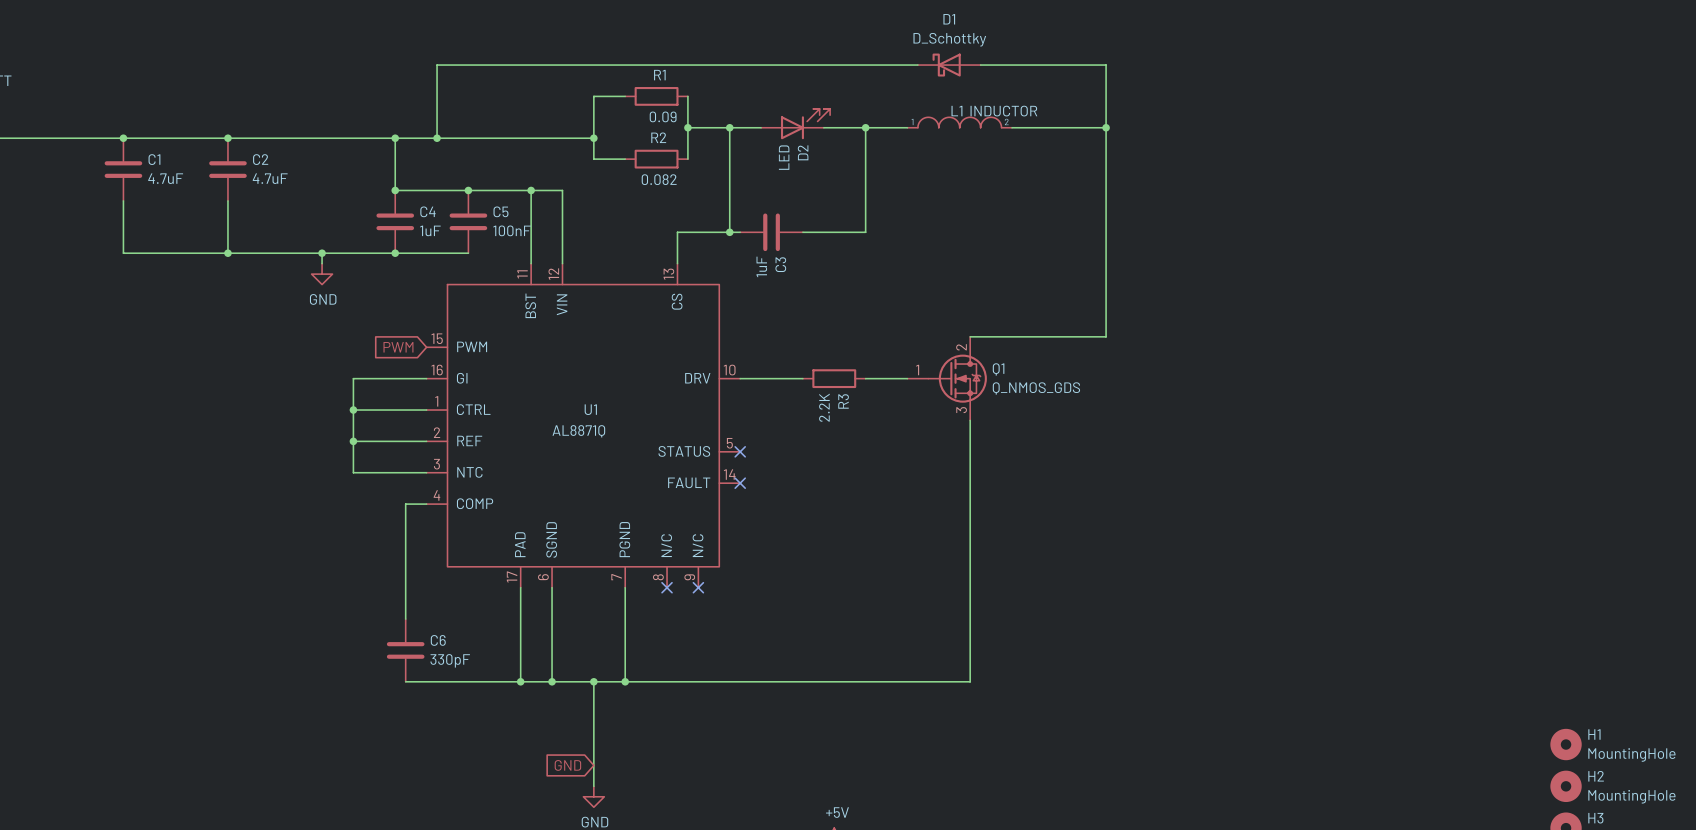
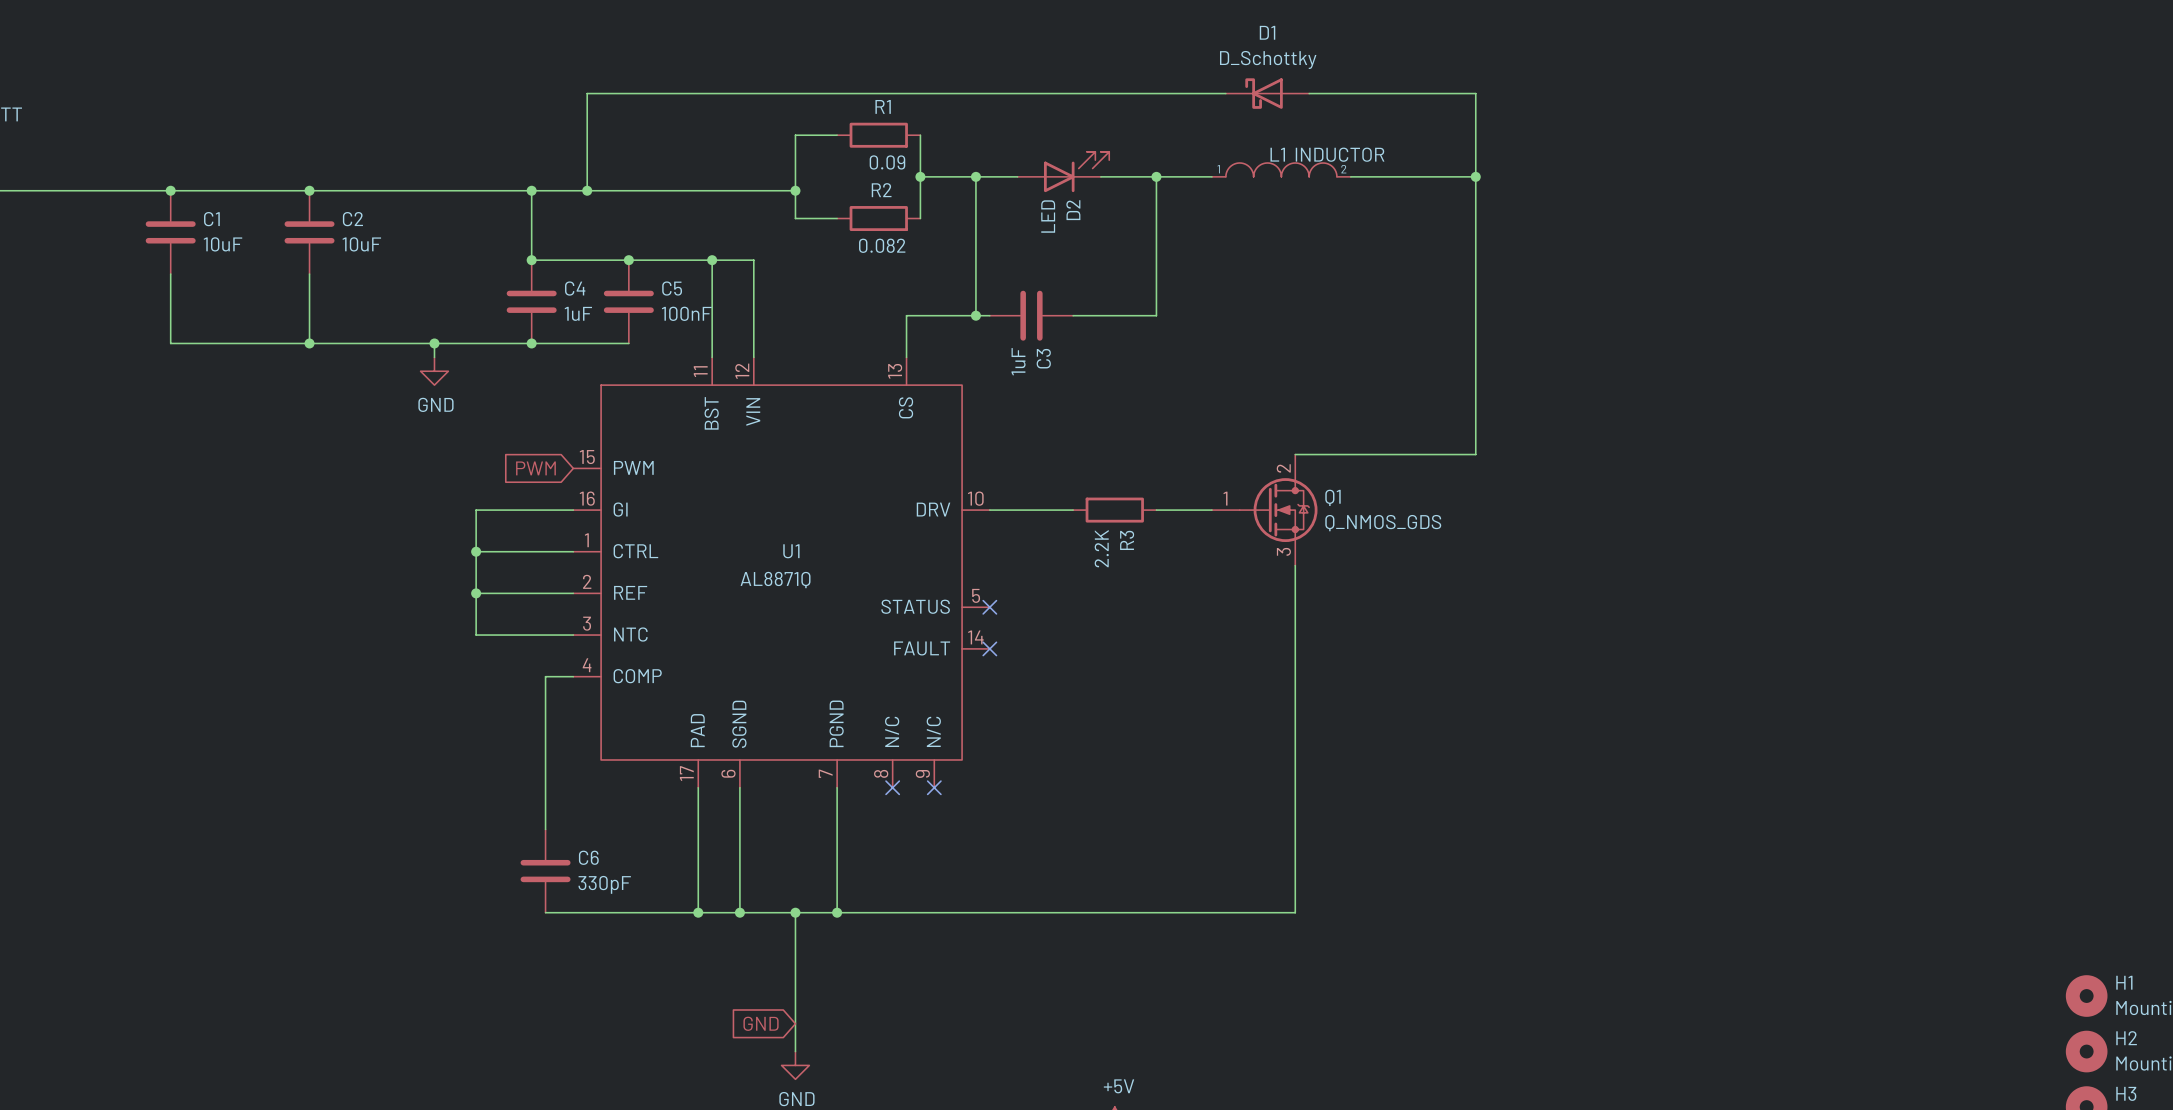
C1 value: 4.7uF (165, 178) -> 10uF (223, 244)
C2 value: 4.7uF (270, 178) -> 10uF (361, 244)

